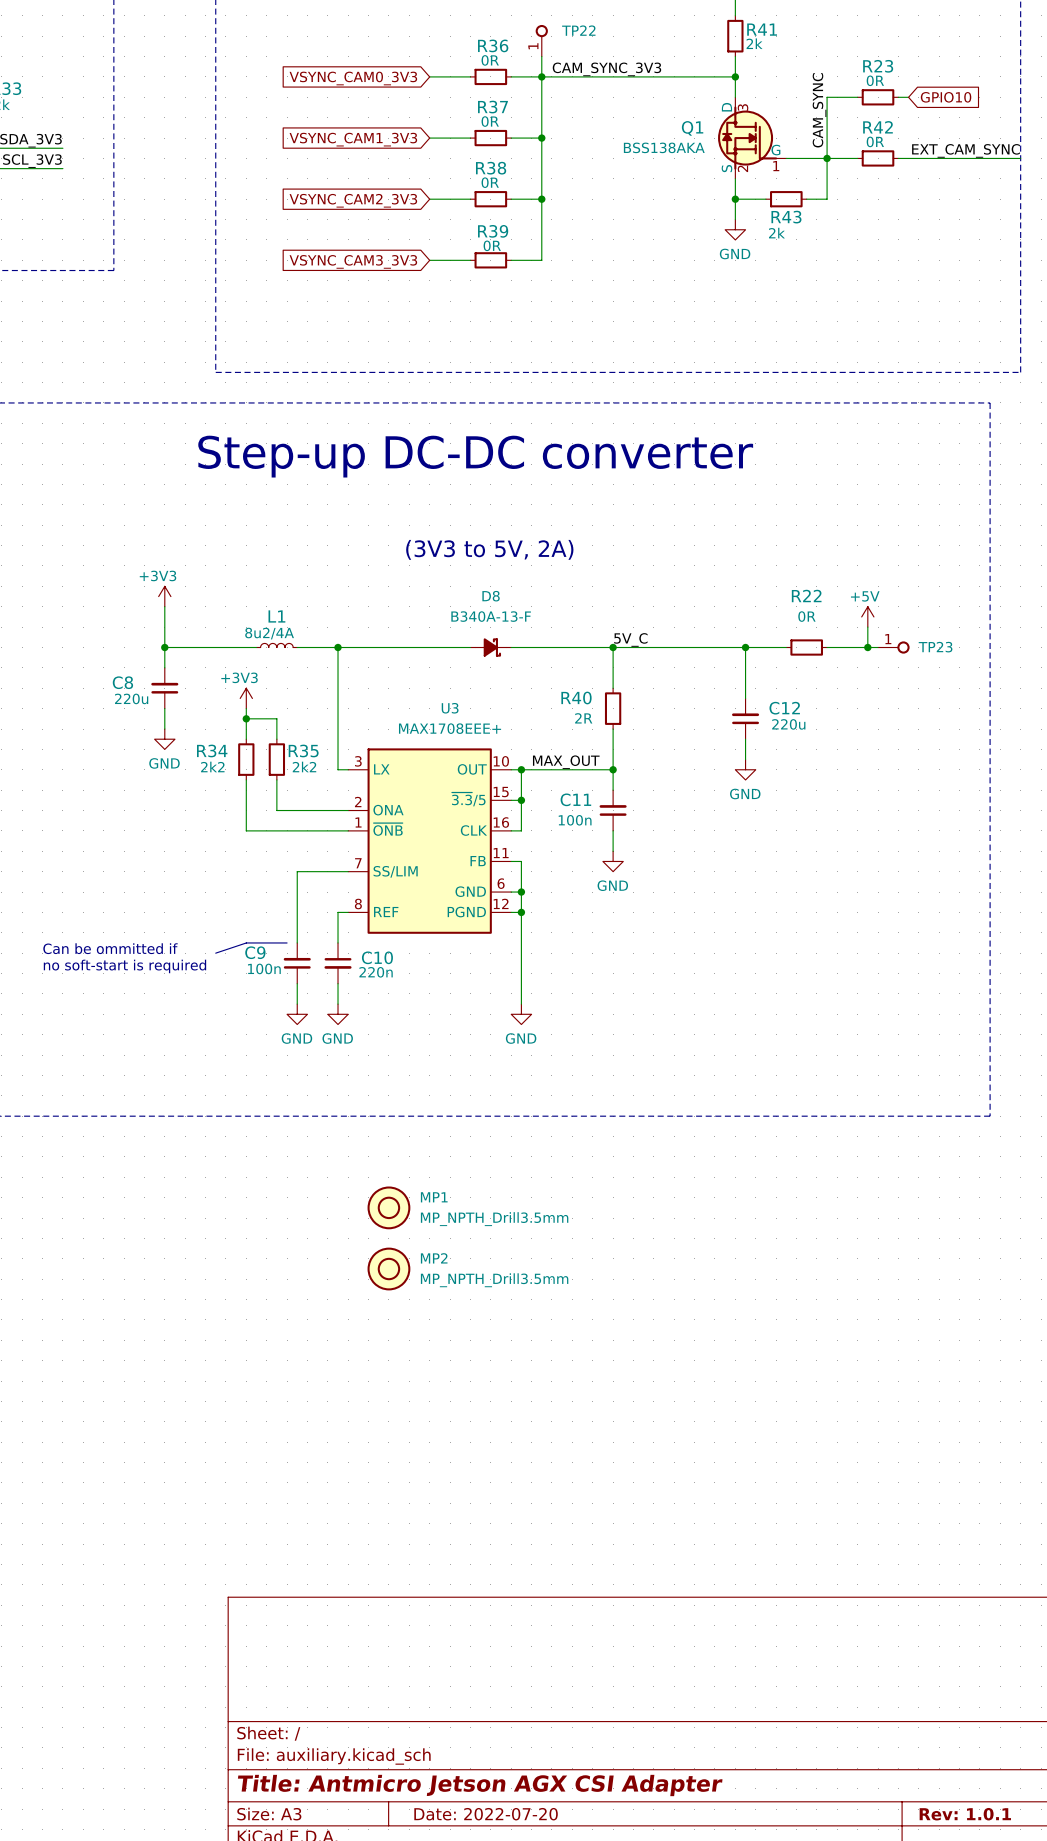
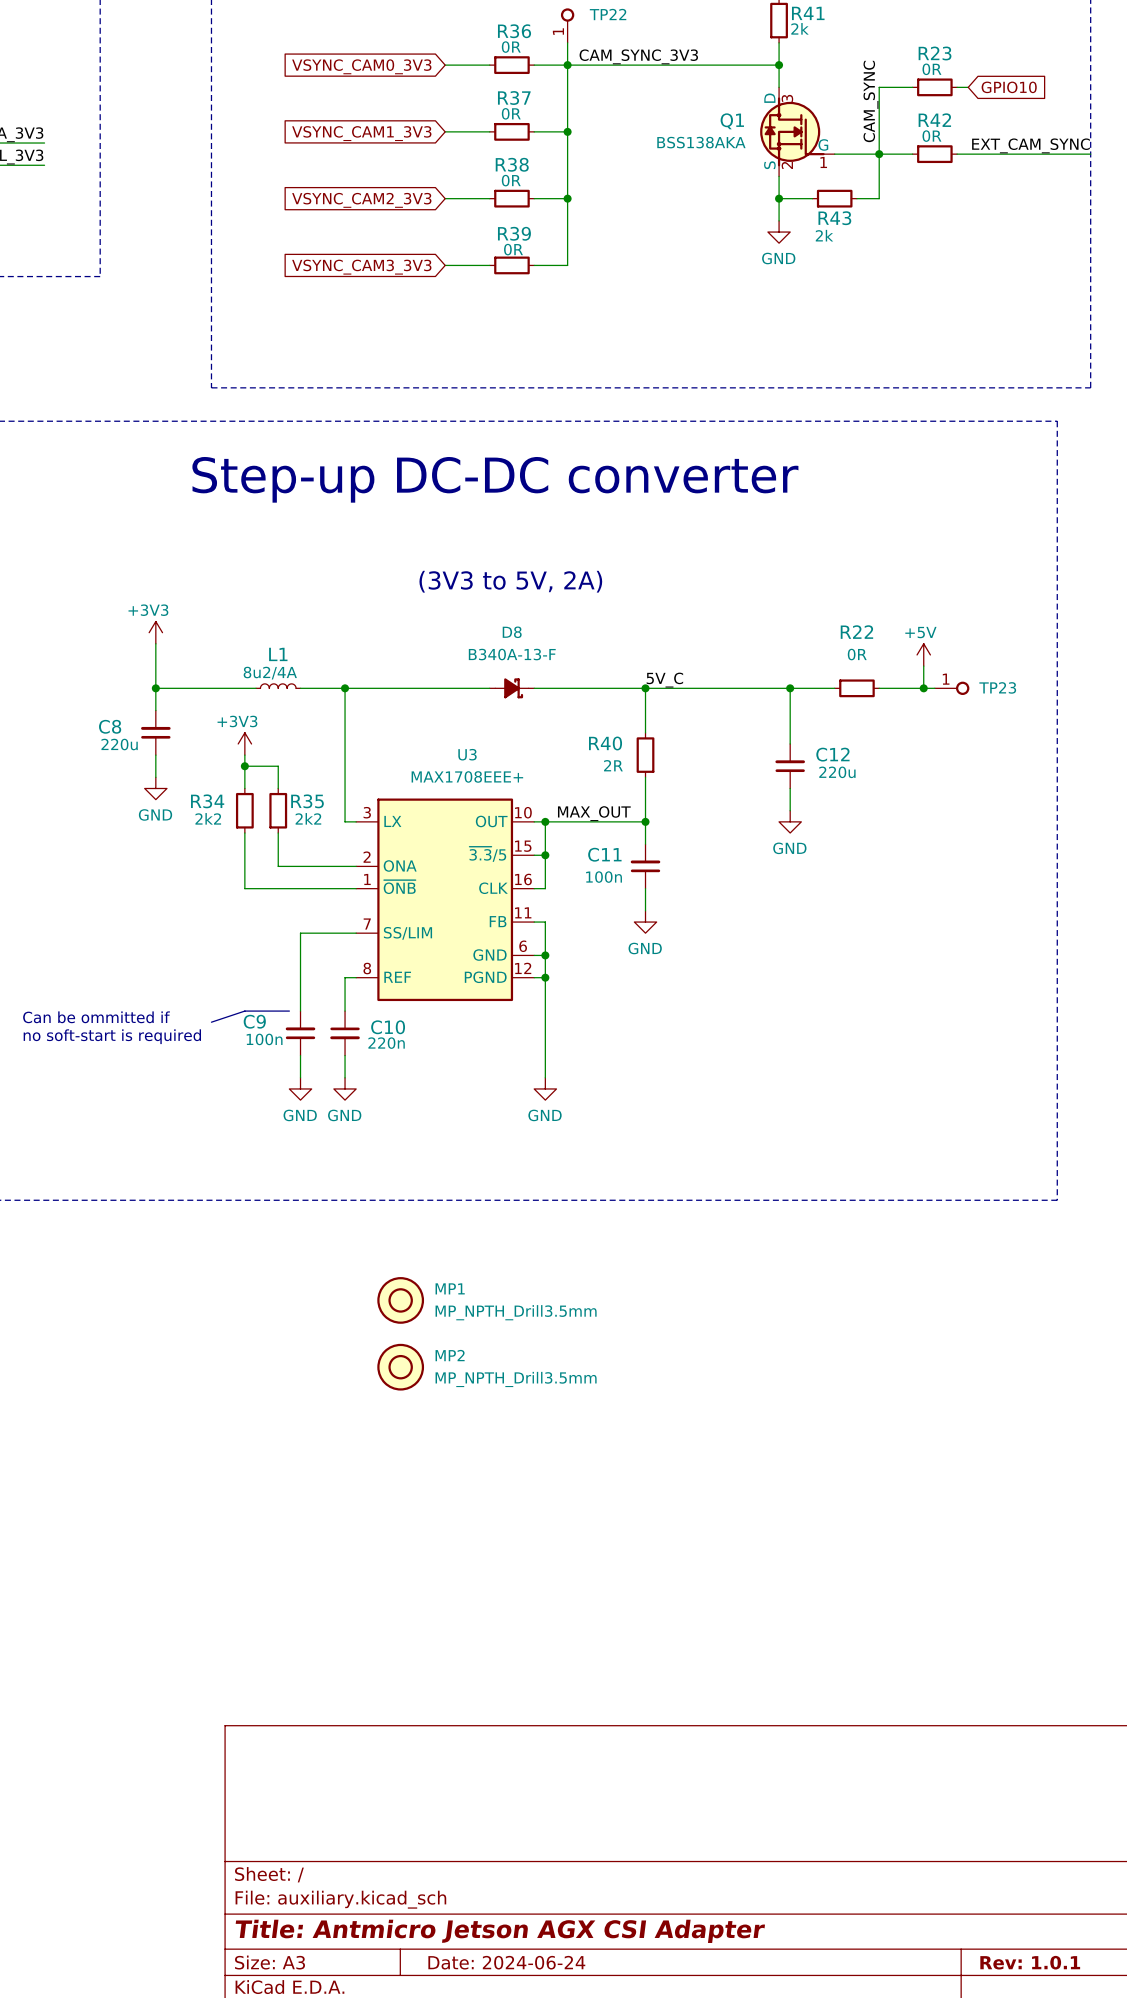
title block: Date: 2022-07-20 (486, 1814) -> Date: 2024-06-24 (506, 1962)

